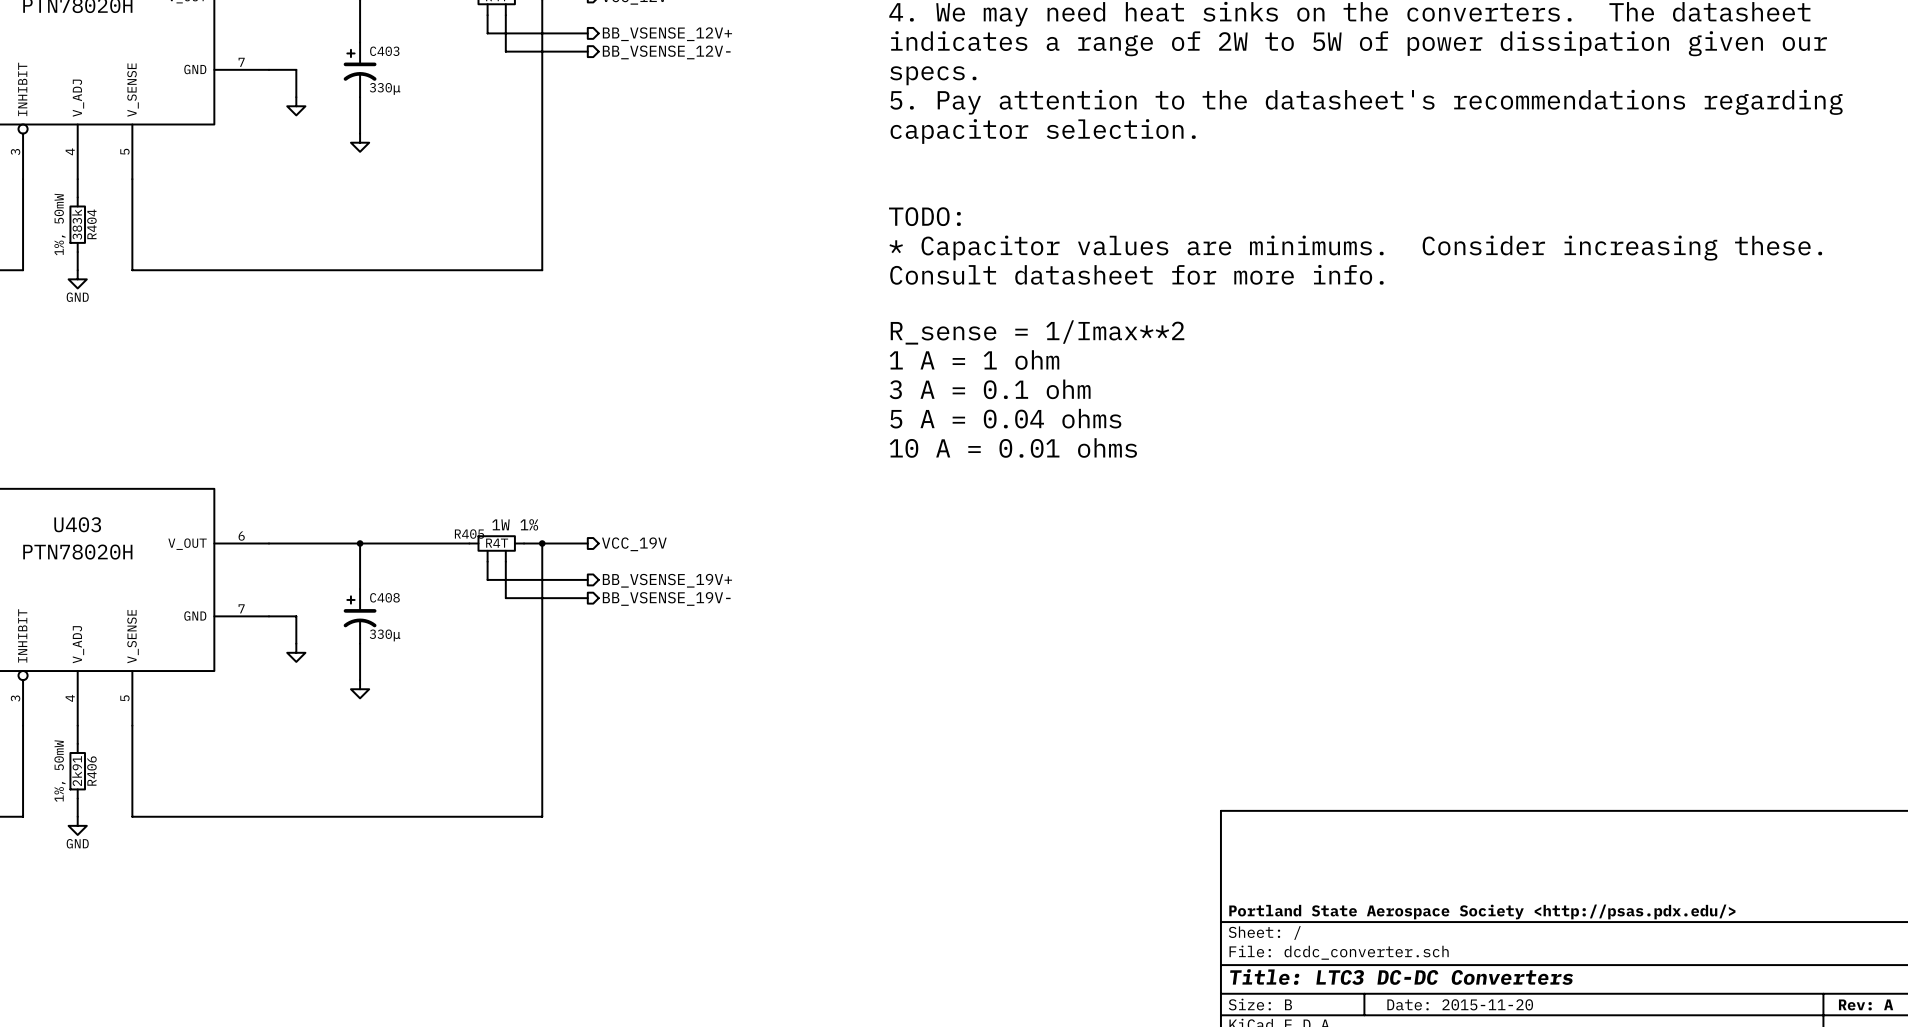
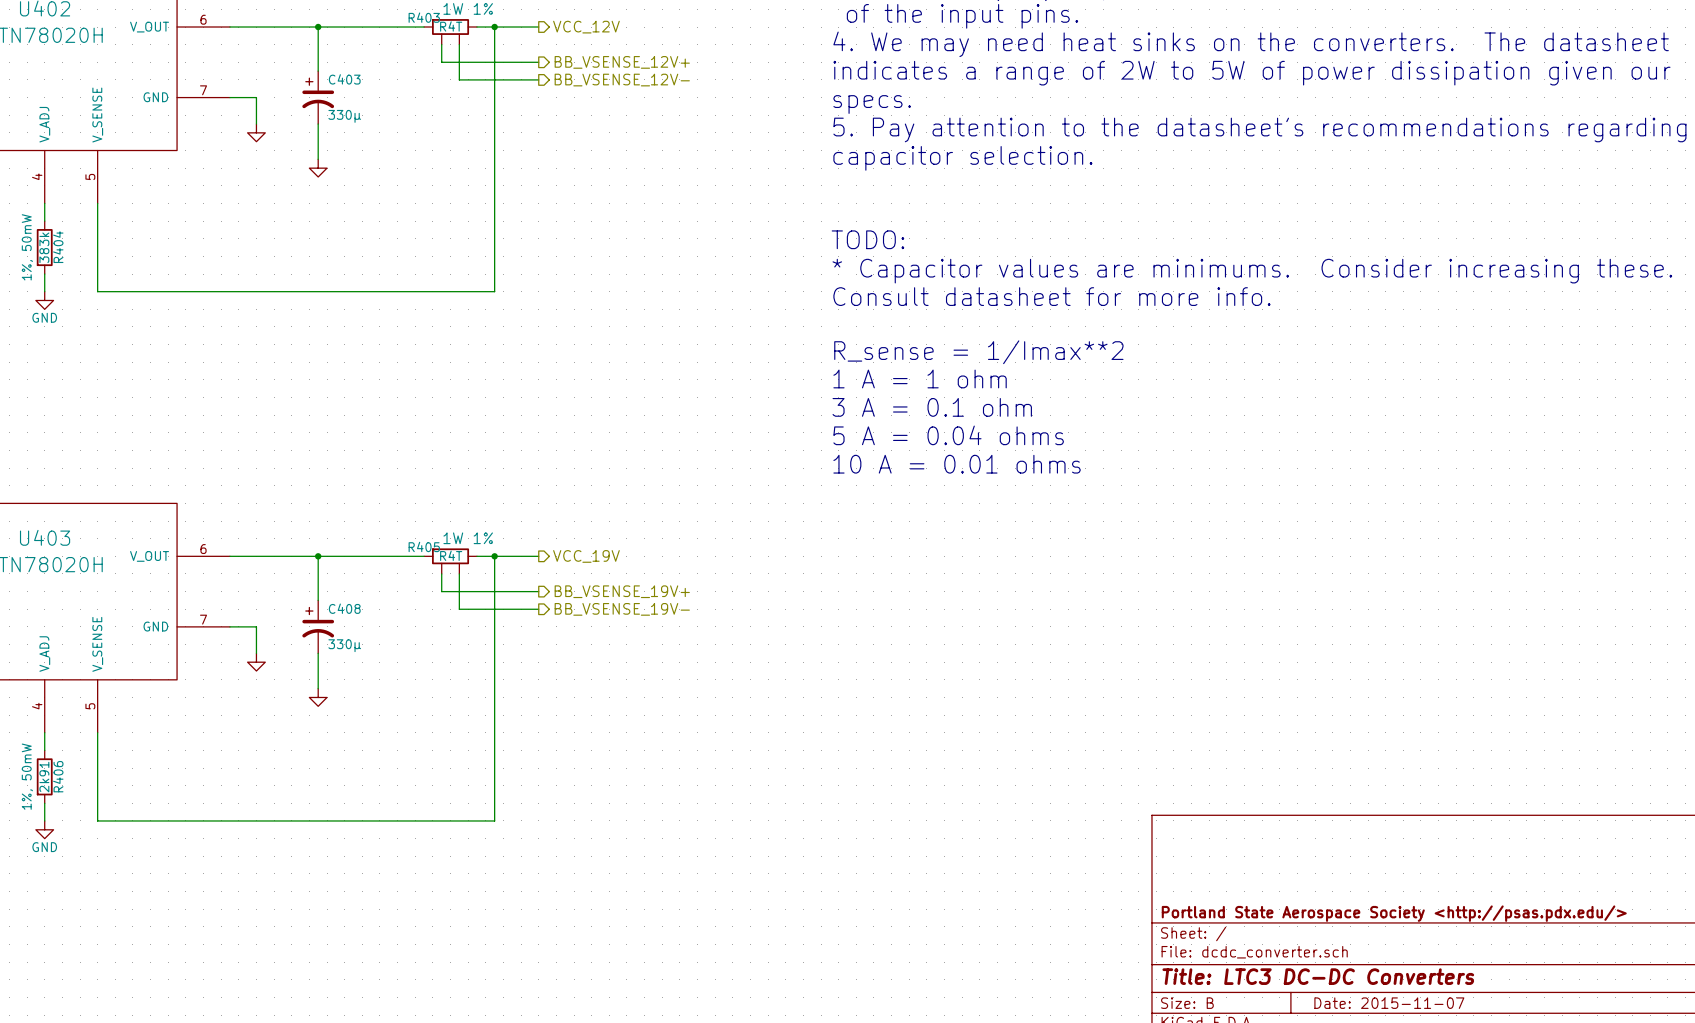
title block: Date: 2015-11-20 (1460, 1004) -> Date: 2015-11-07 (1389, 1003)

